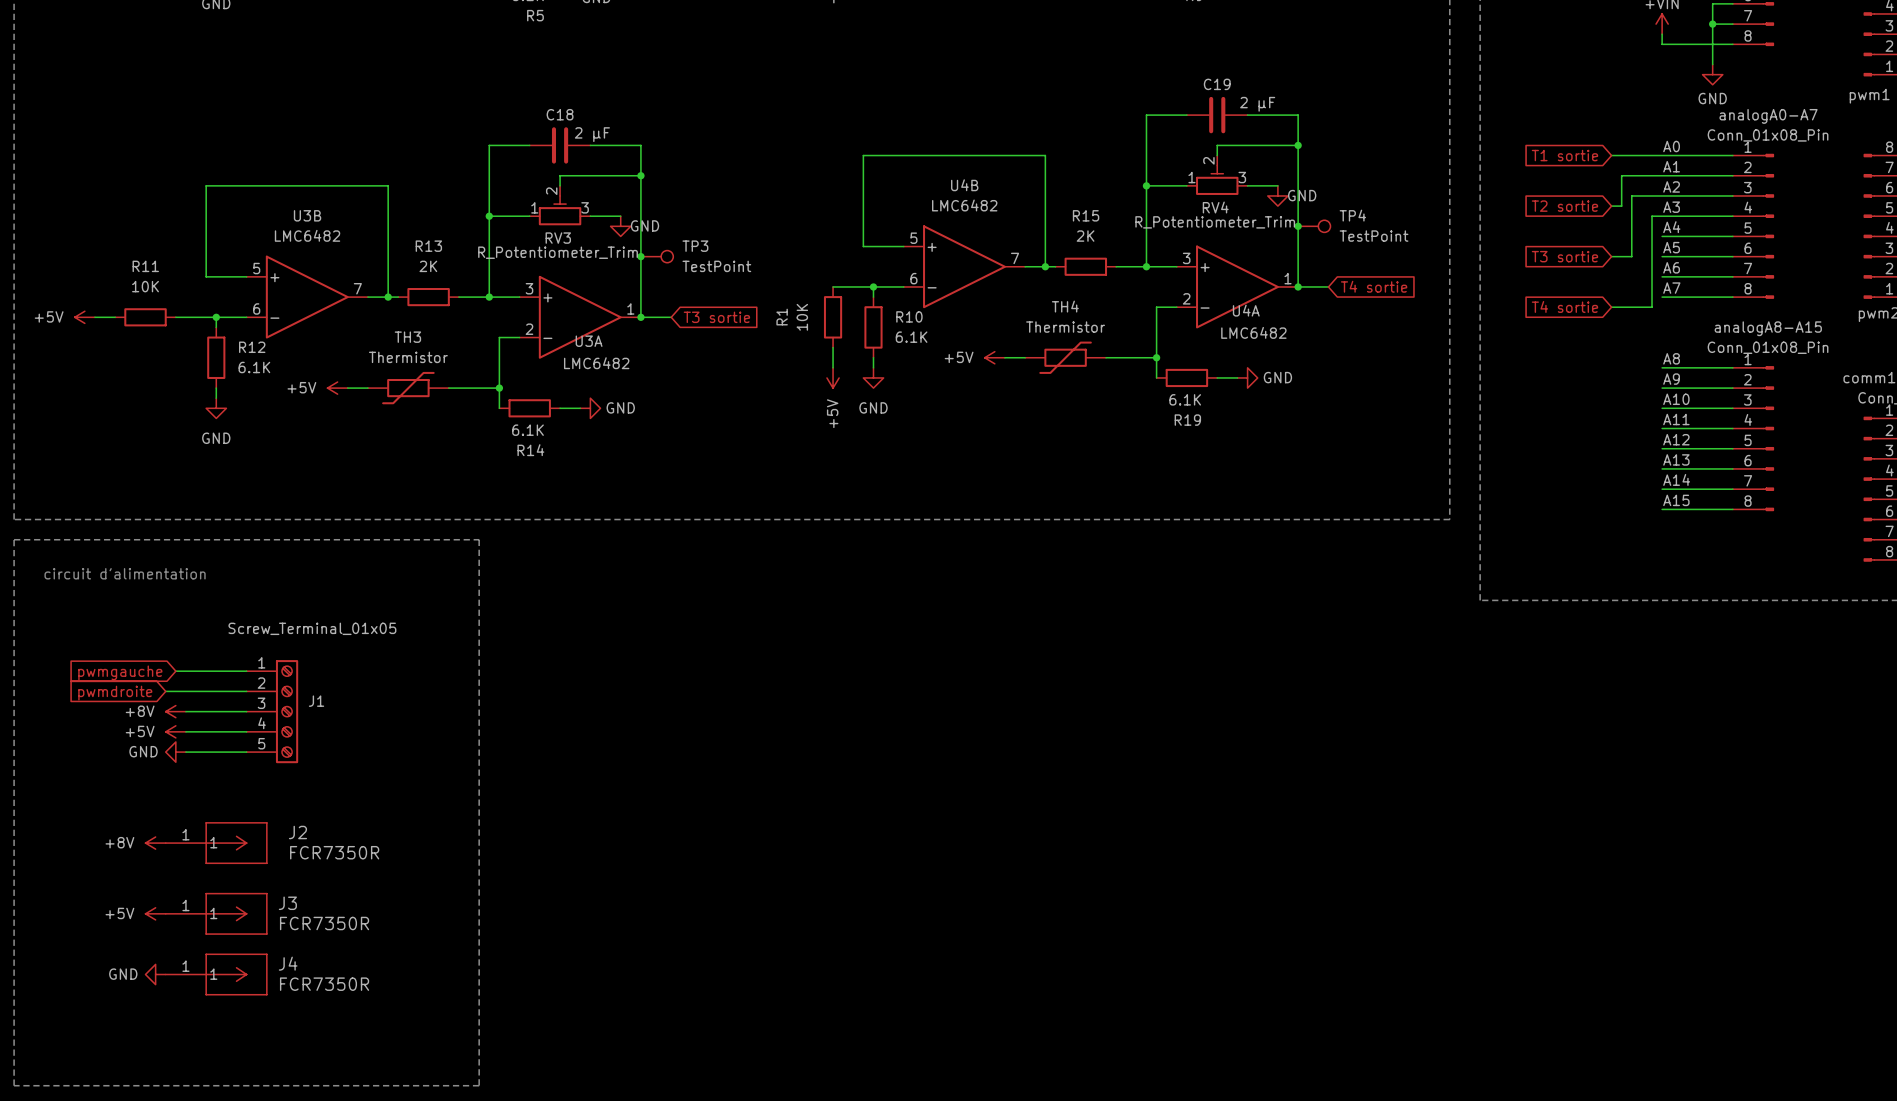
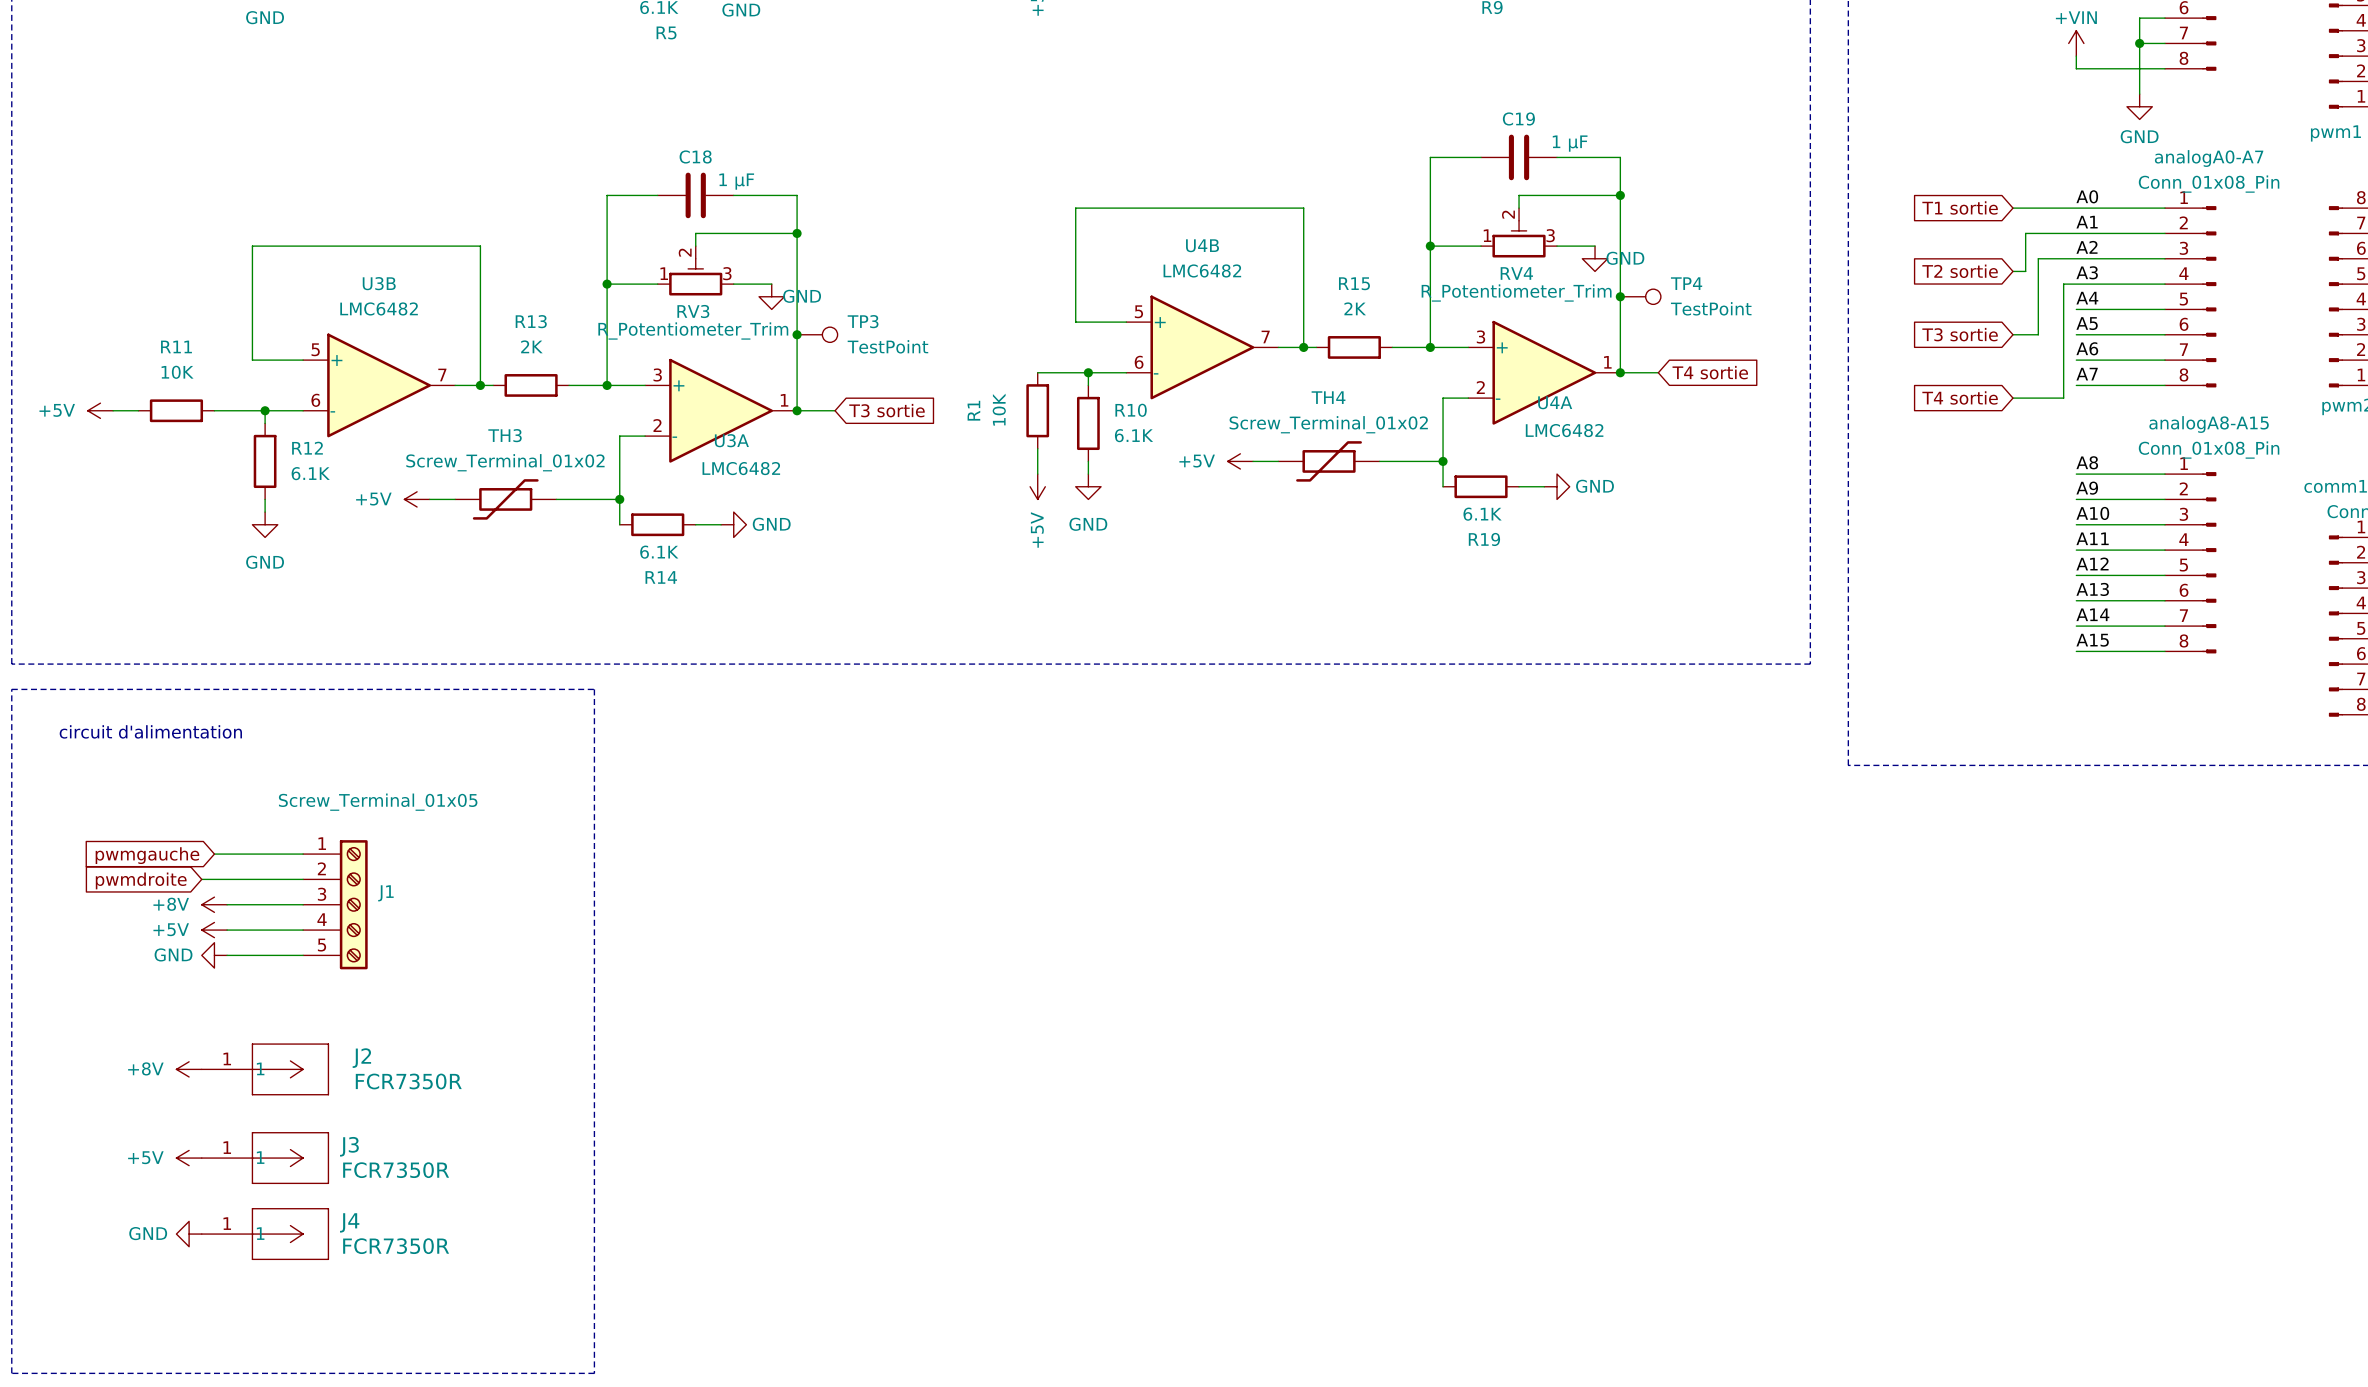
C19 value: 2 μF (1257, 104) -> 1 μF (1570, 143)
C18 value: 2 μF (592, 134) -> 1 μF (736, 181)
TH4 value: Thermistor (1065, 327) -> Screw_Terminal_01x02 (1328, 424)
TH3 value: Thermistor (408, 357) -> Screw_Terminal_01x02 (505, 462)

